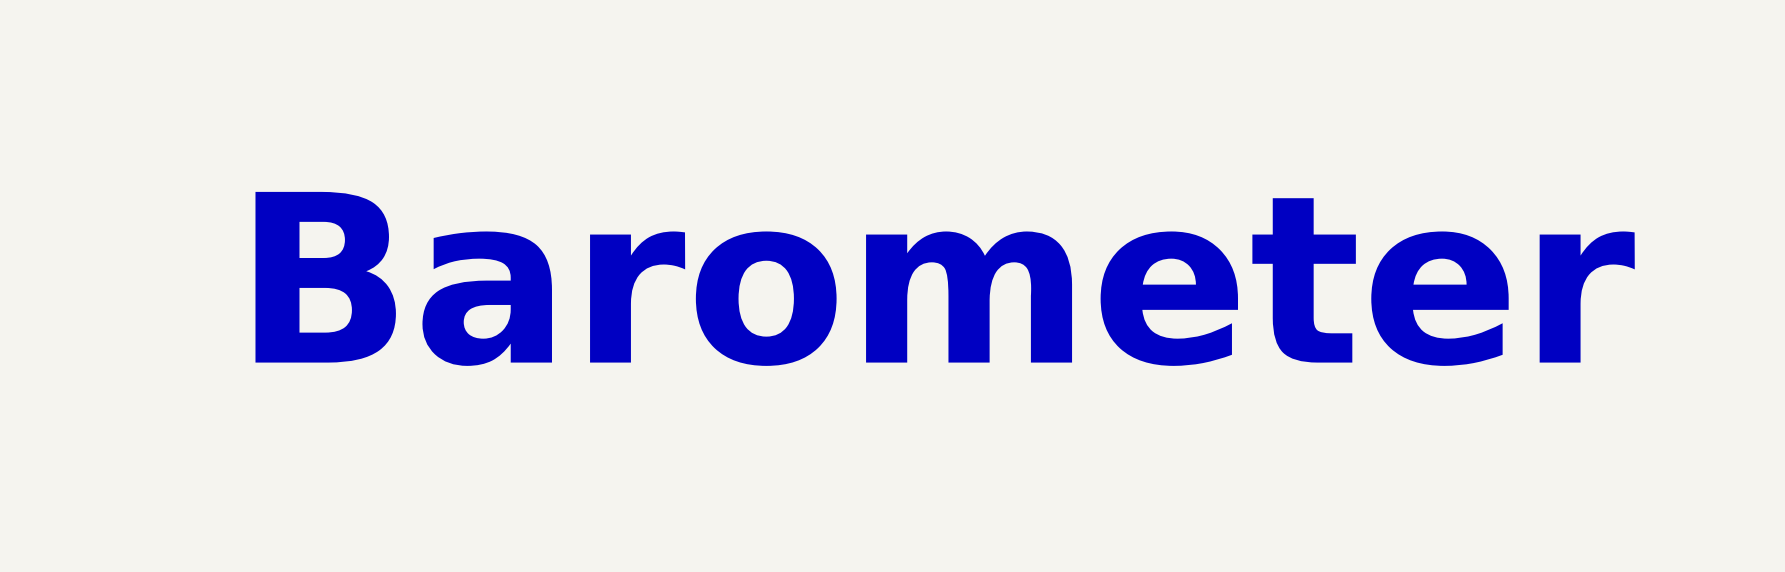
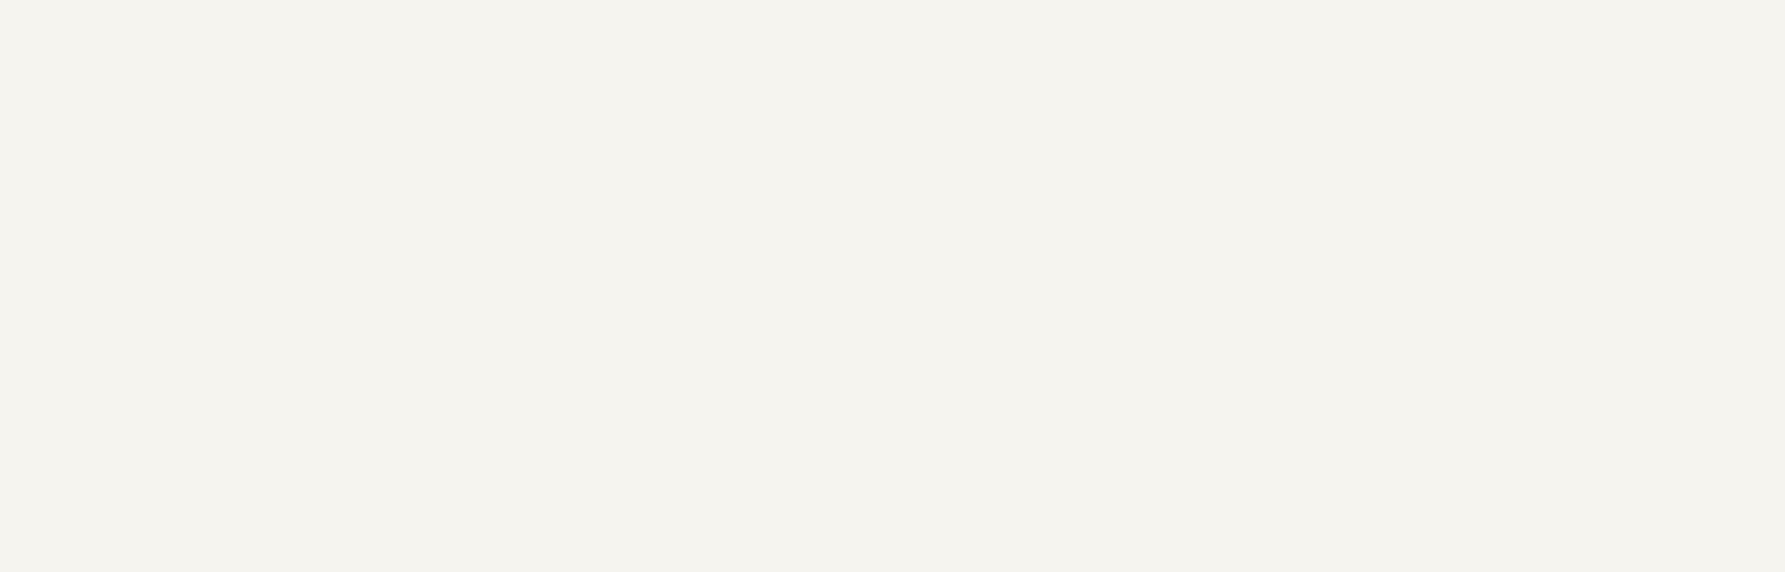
text: Barometer (945, 278) -> none

